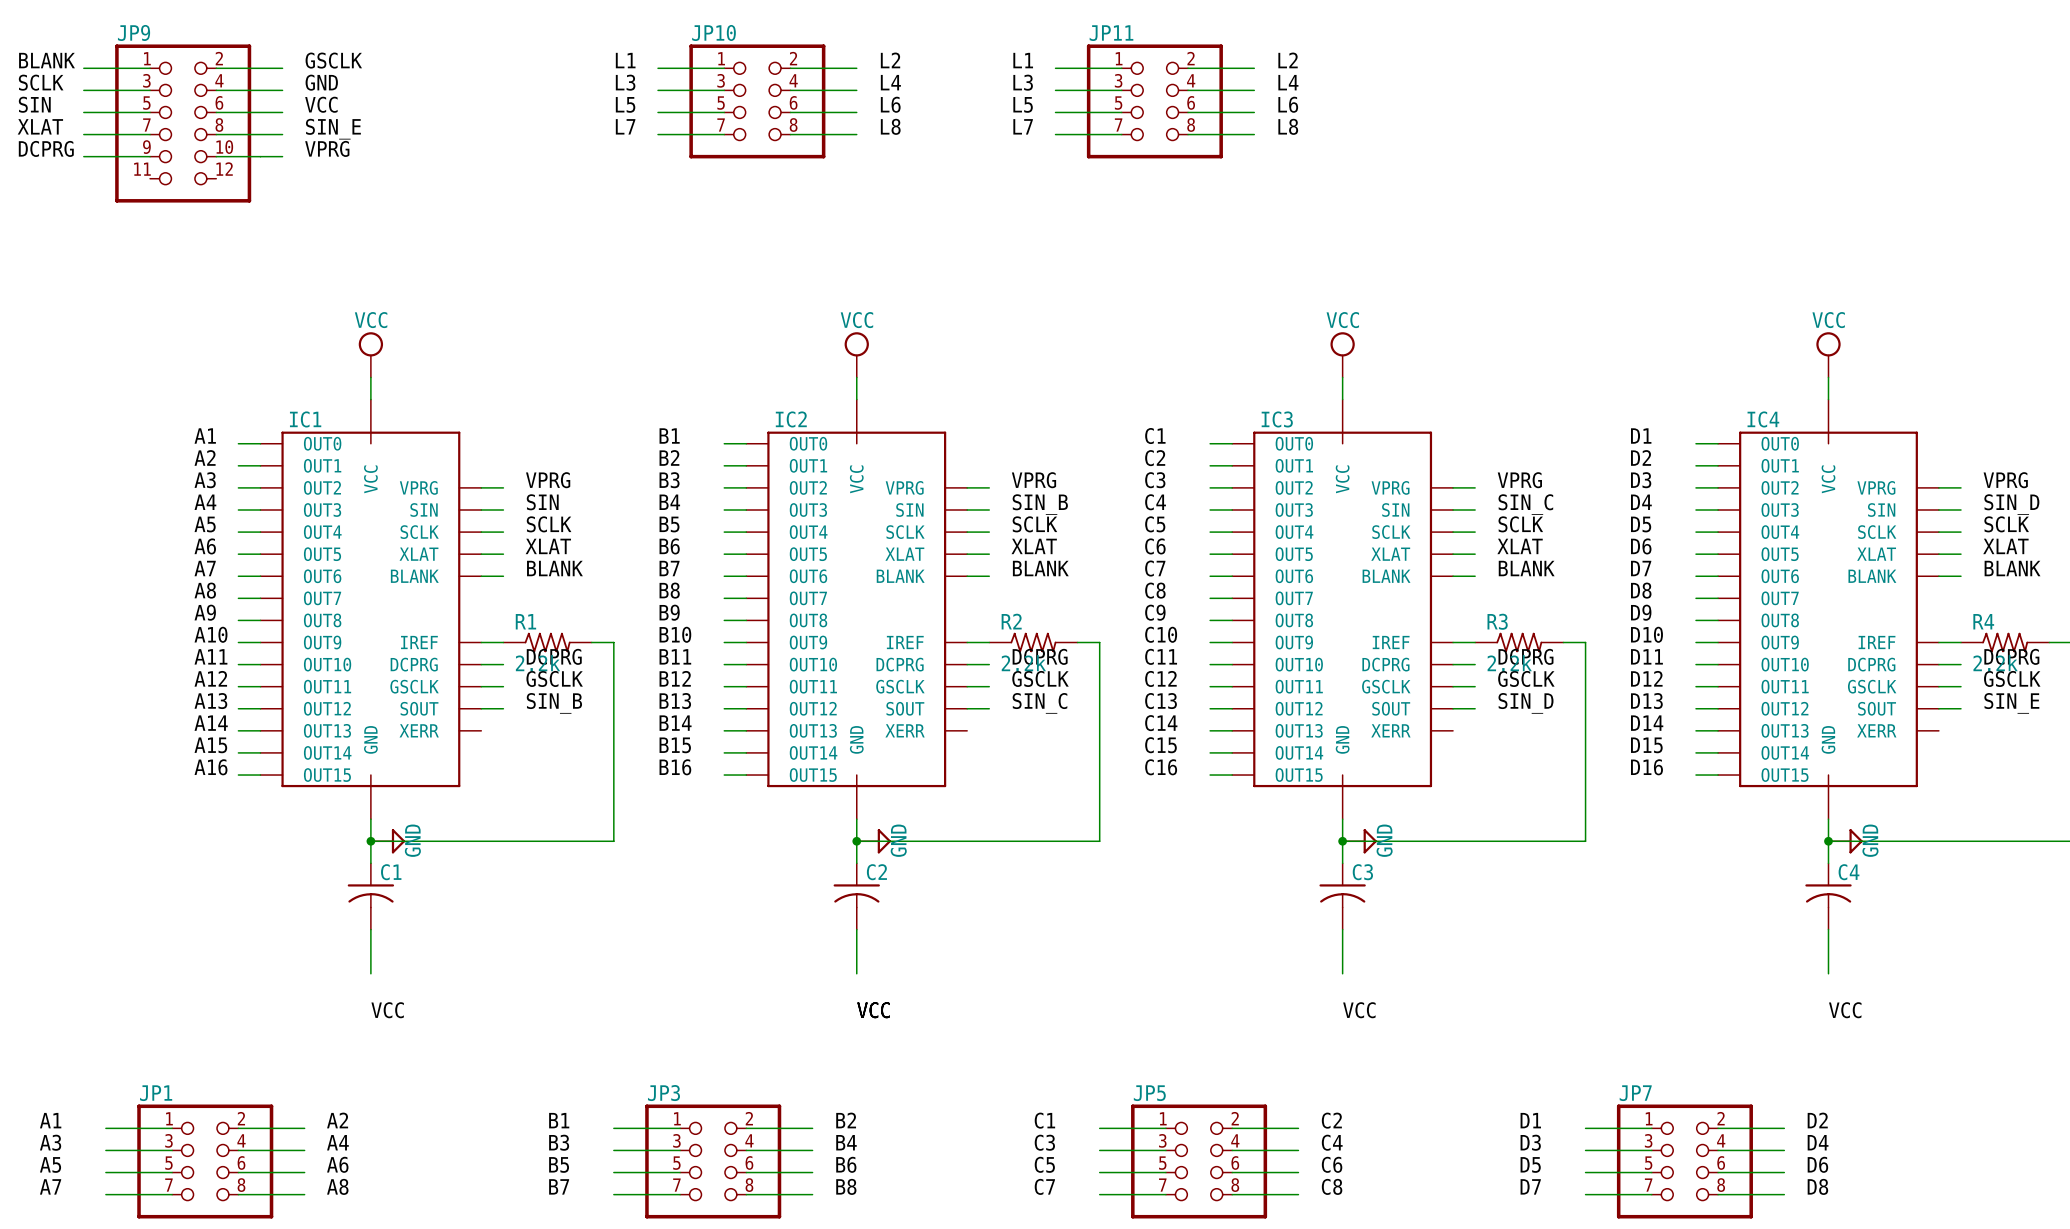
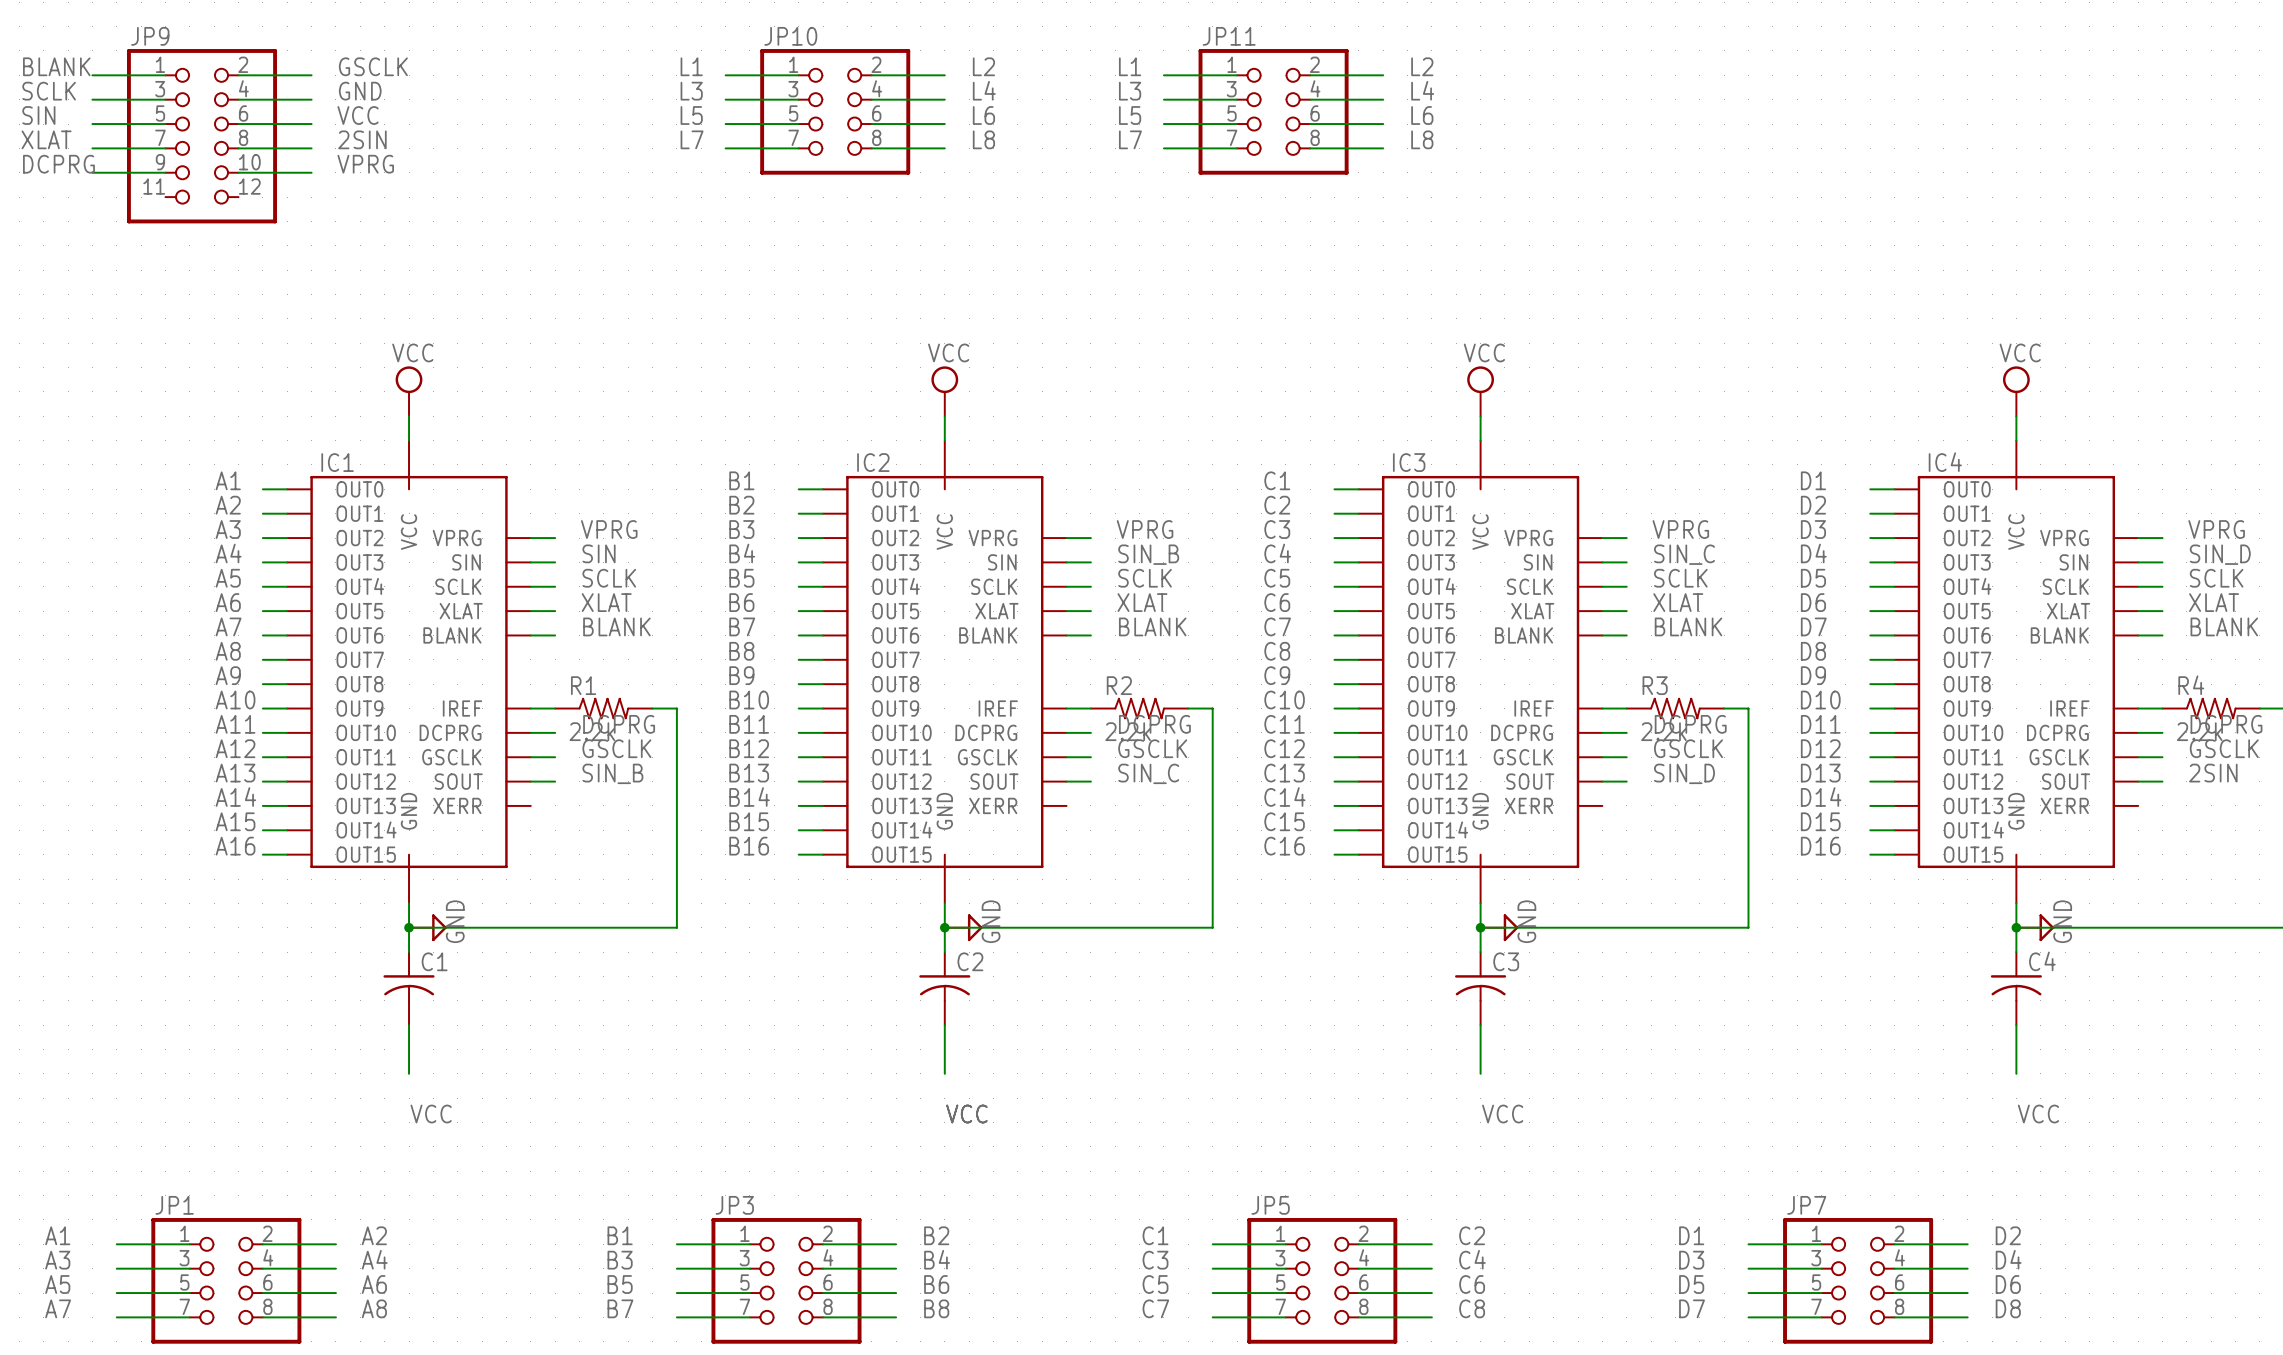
label: SIN_E (333, 129) -> 2SIN (362, 139)
label: SIN_E (2011, 703) -> 2SIN (2213, 773)

